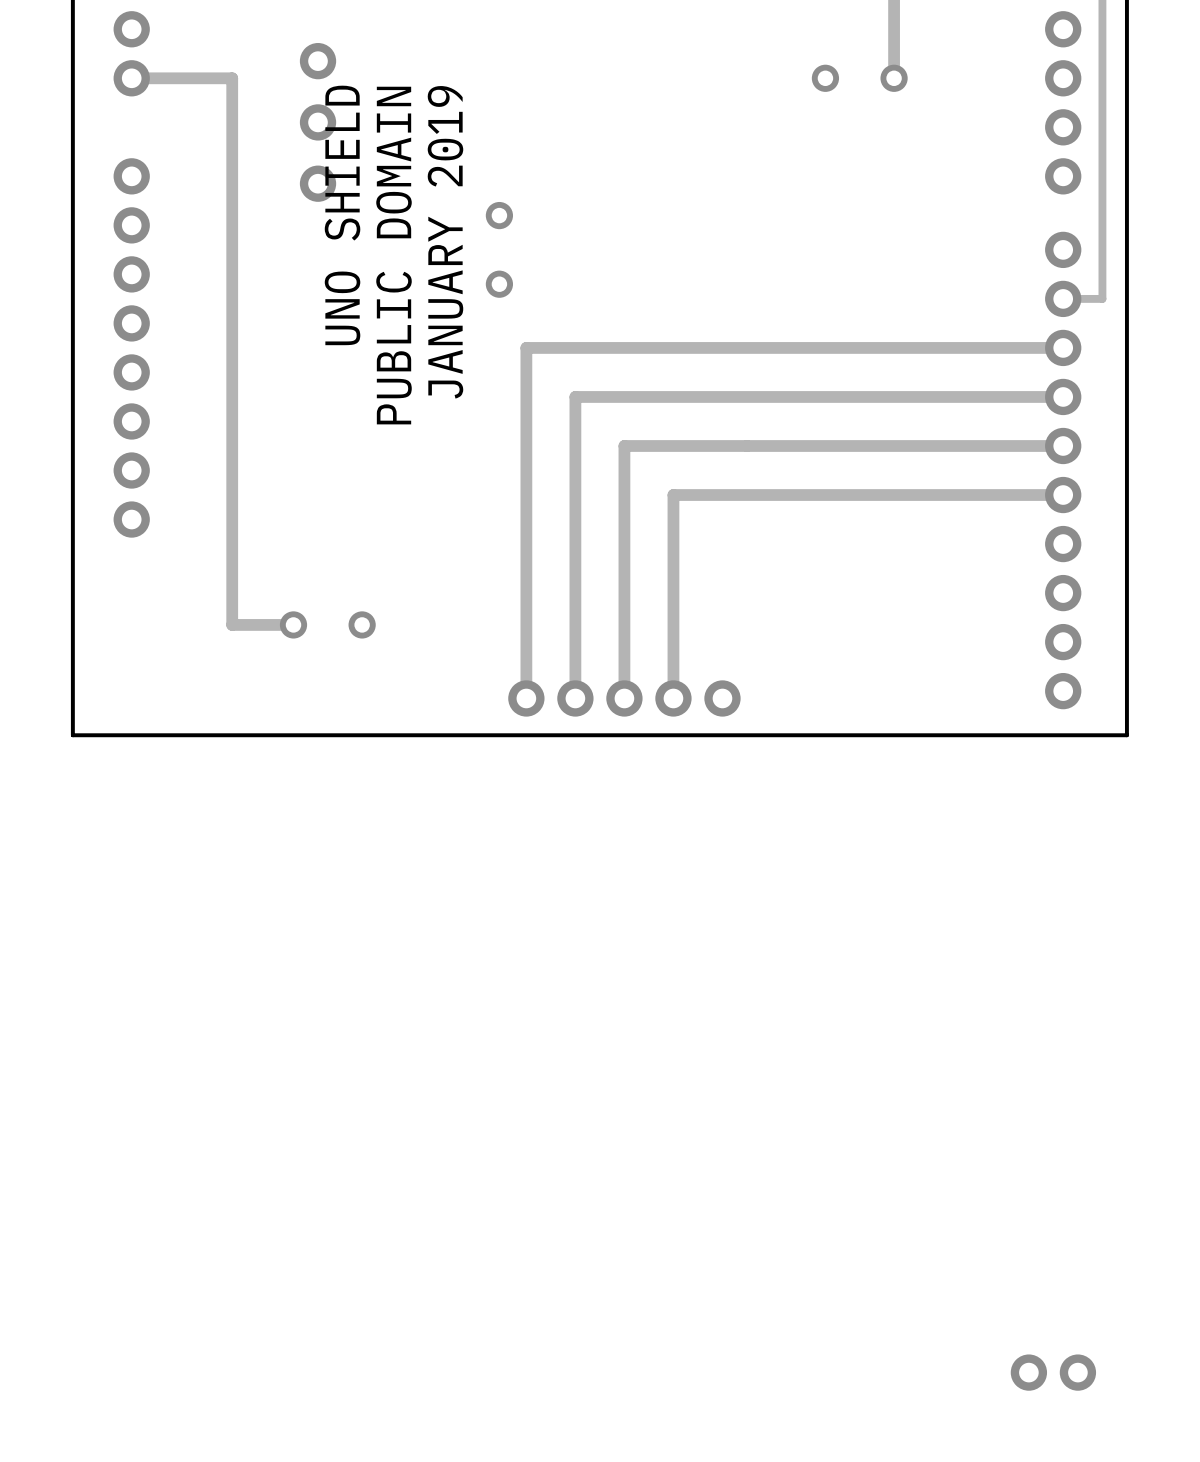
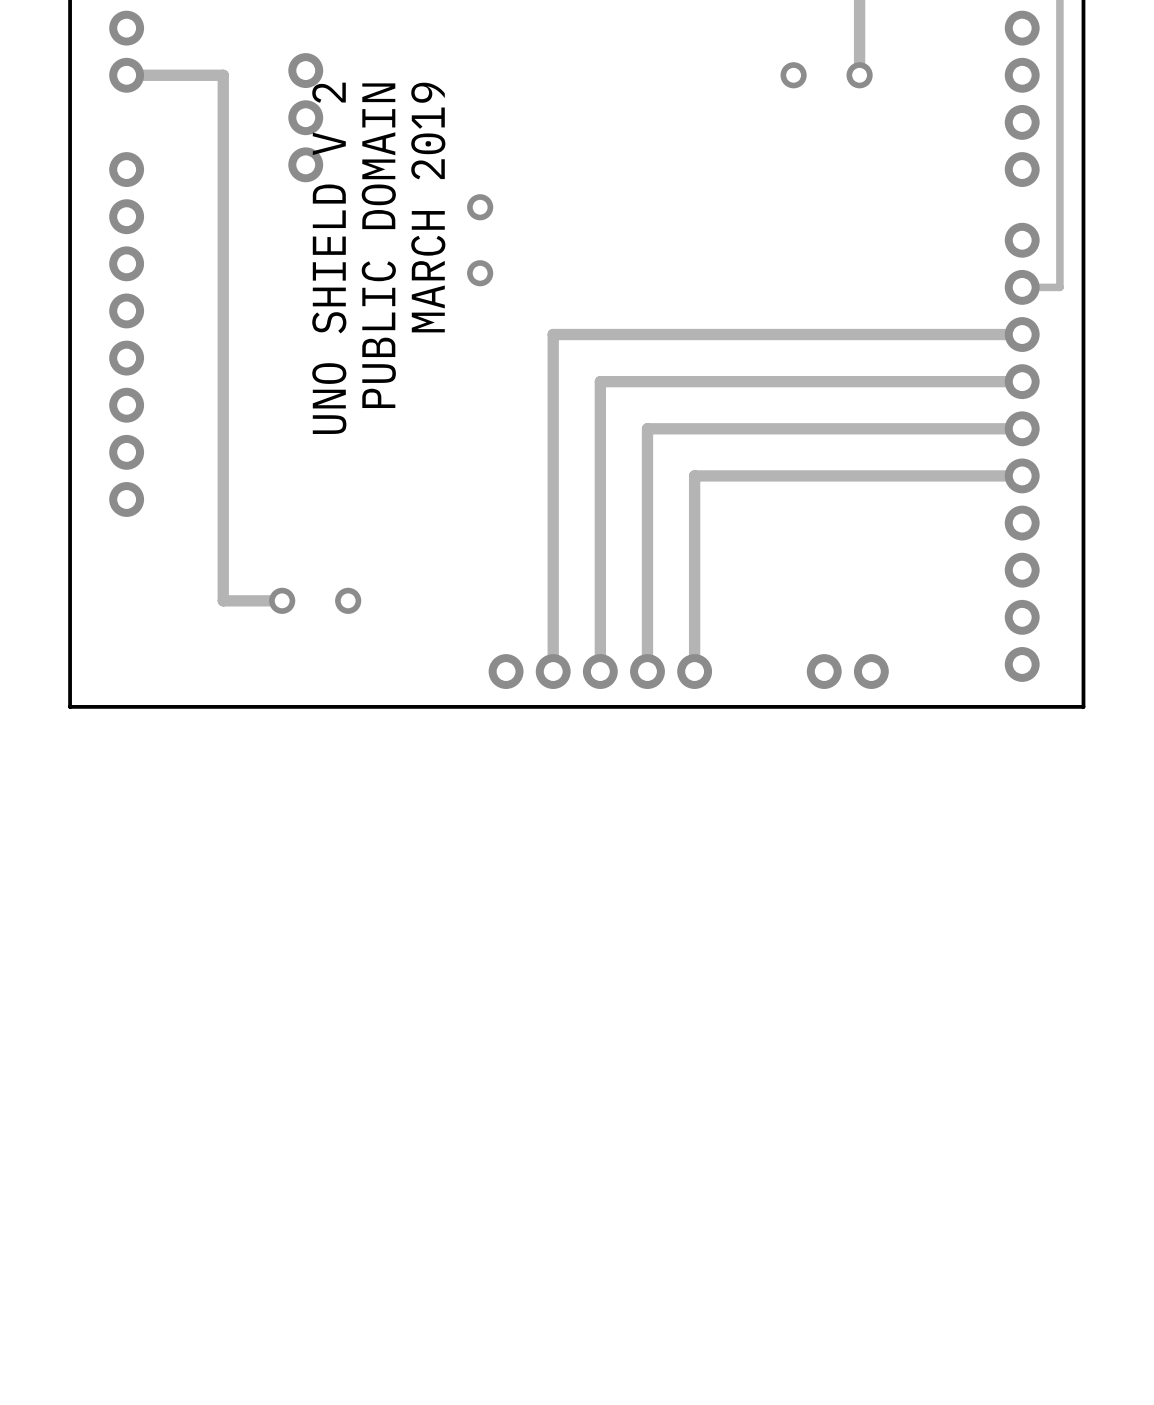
part: (318, 61) -> none
part footprint: [299, 104, 337, 141] -> [288, 53, 324, 183]
part: (318, 183) -> none
text: UNO SHIELD (342, 215) -> UNO SHIELD V 2 (329, 258)
text: JANUARY 2019 (445, 242) -> MARCH 2019 (428, 207)
track: (575, 347) (526, 347) (526, 698) -> none
track: (624, 396) (575, 396) -> (553, 334) (553, 381)
track: (673, 445) (624, 445) -> (600, 381) (600, 428)
track: (722, 495) (673, 495) -> (647, 428) (647, 475)
track: none -> (694, 475) (694, 671)
part: none -> (847, 671)
part: (1053, 1372) -> none

